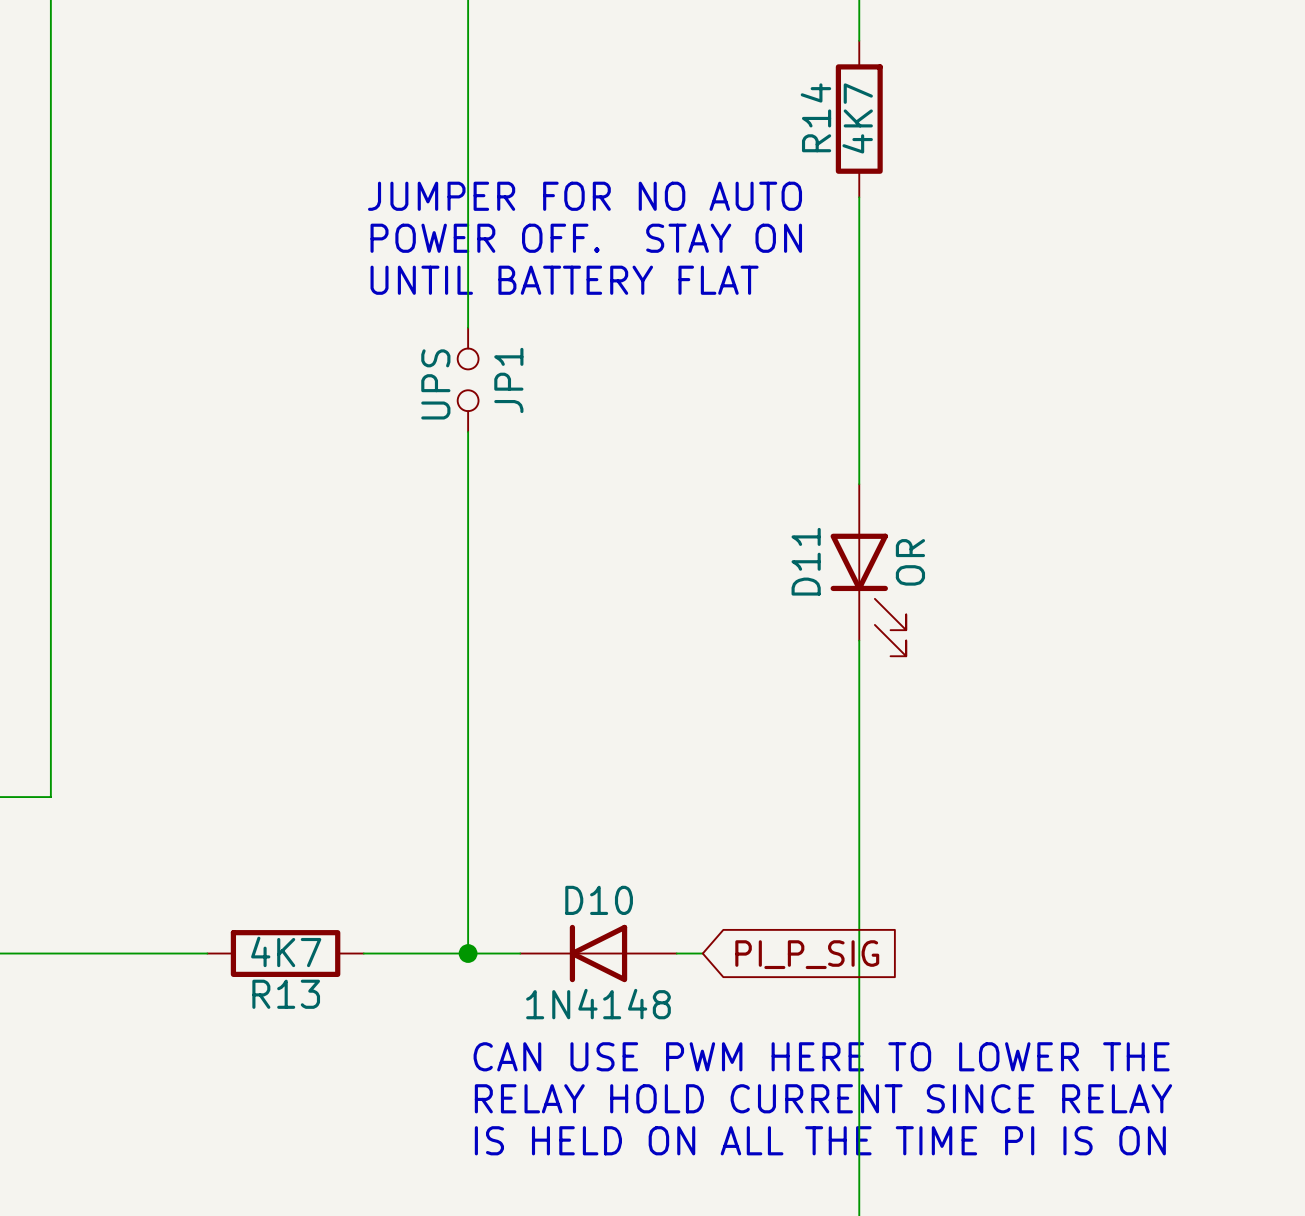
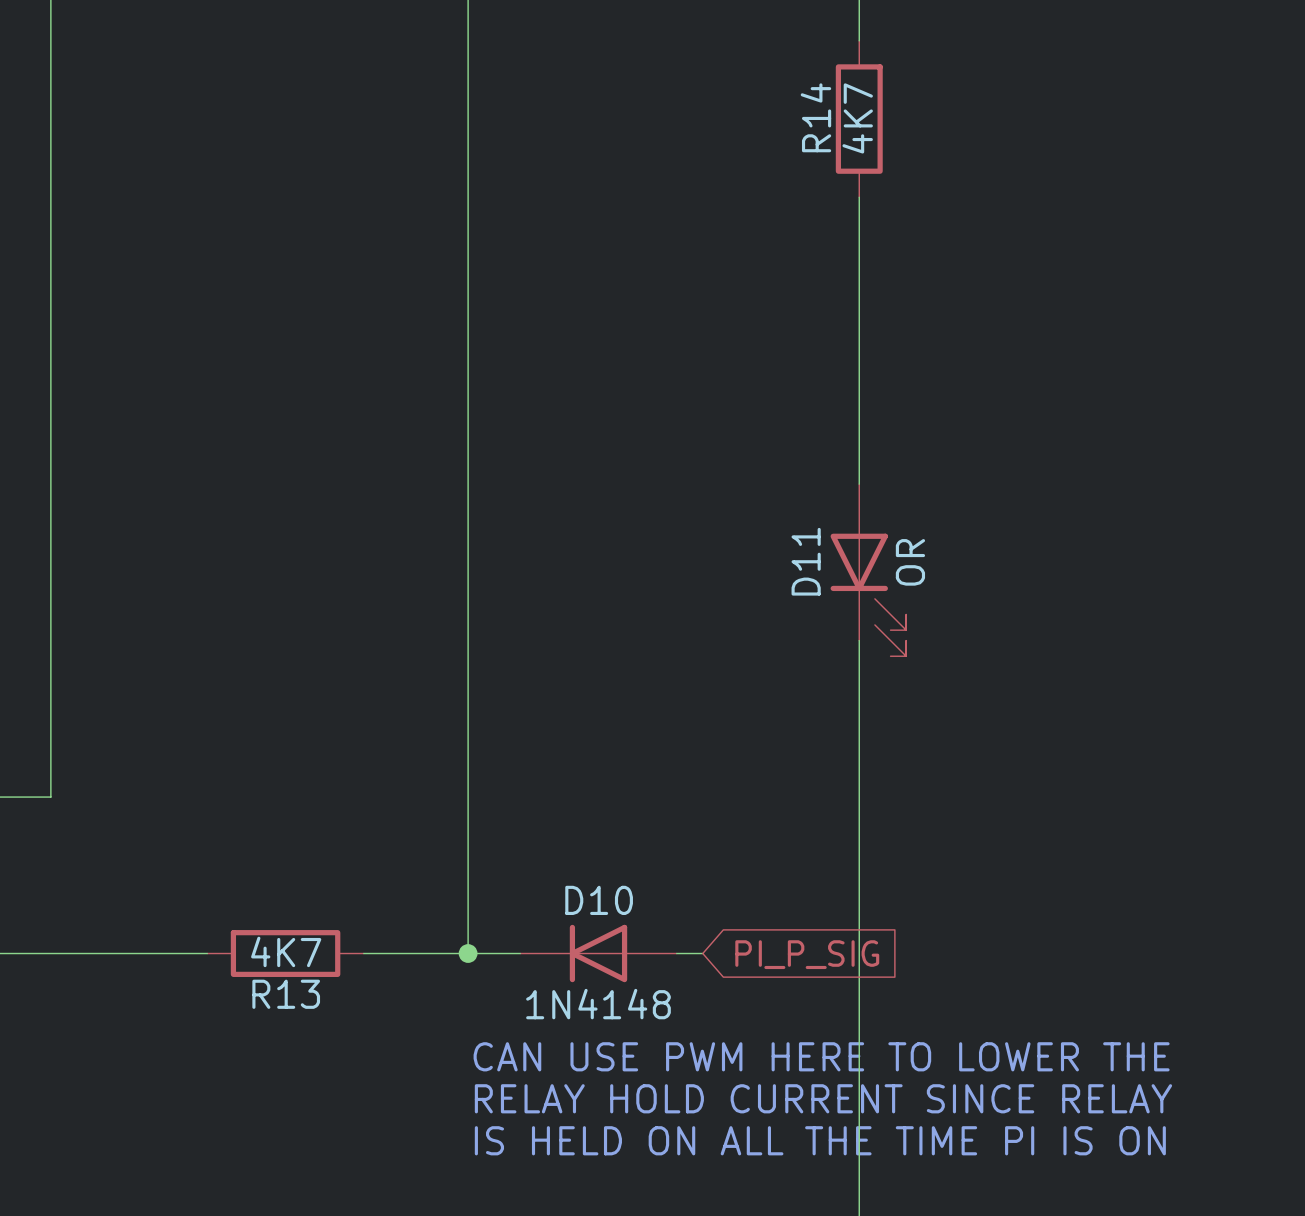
text: JUMPER FOR NO AUTO (585, 196) -> none
text: POWER OFF. STAY ON (586, 238) -> none
text: UNTIL BATTERY FLAT (564, 280) -> none
wire: none -> (468, 327) (468, 431)
JP1: UPS (468, 379) -> none

